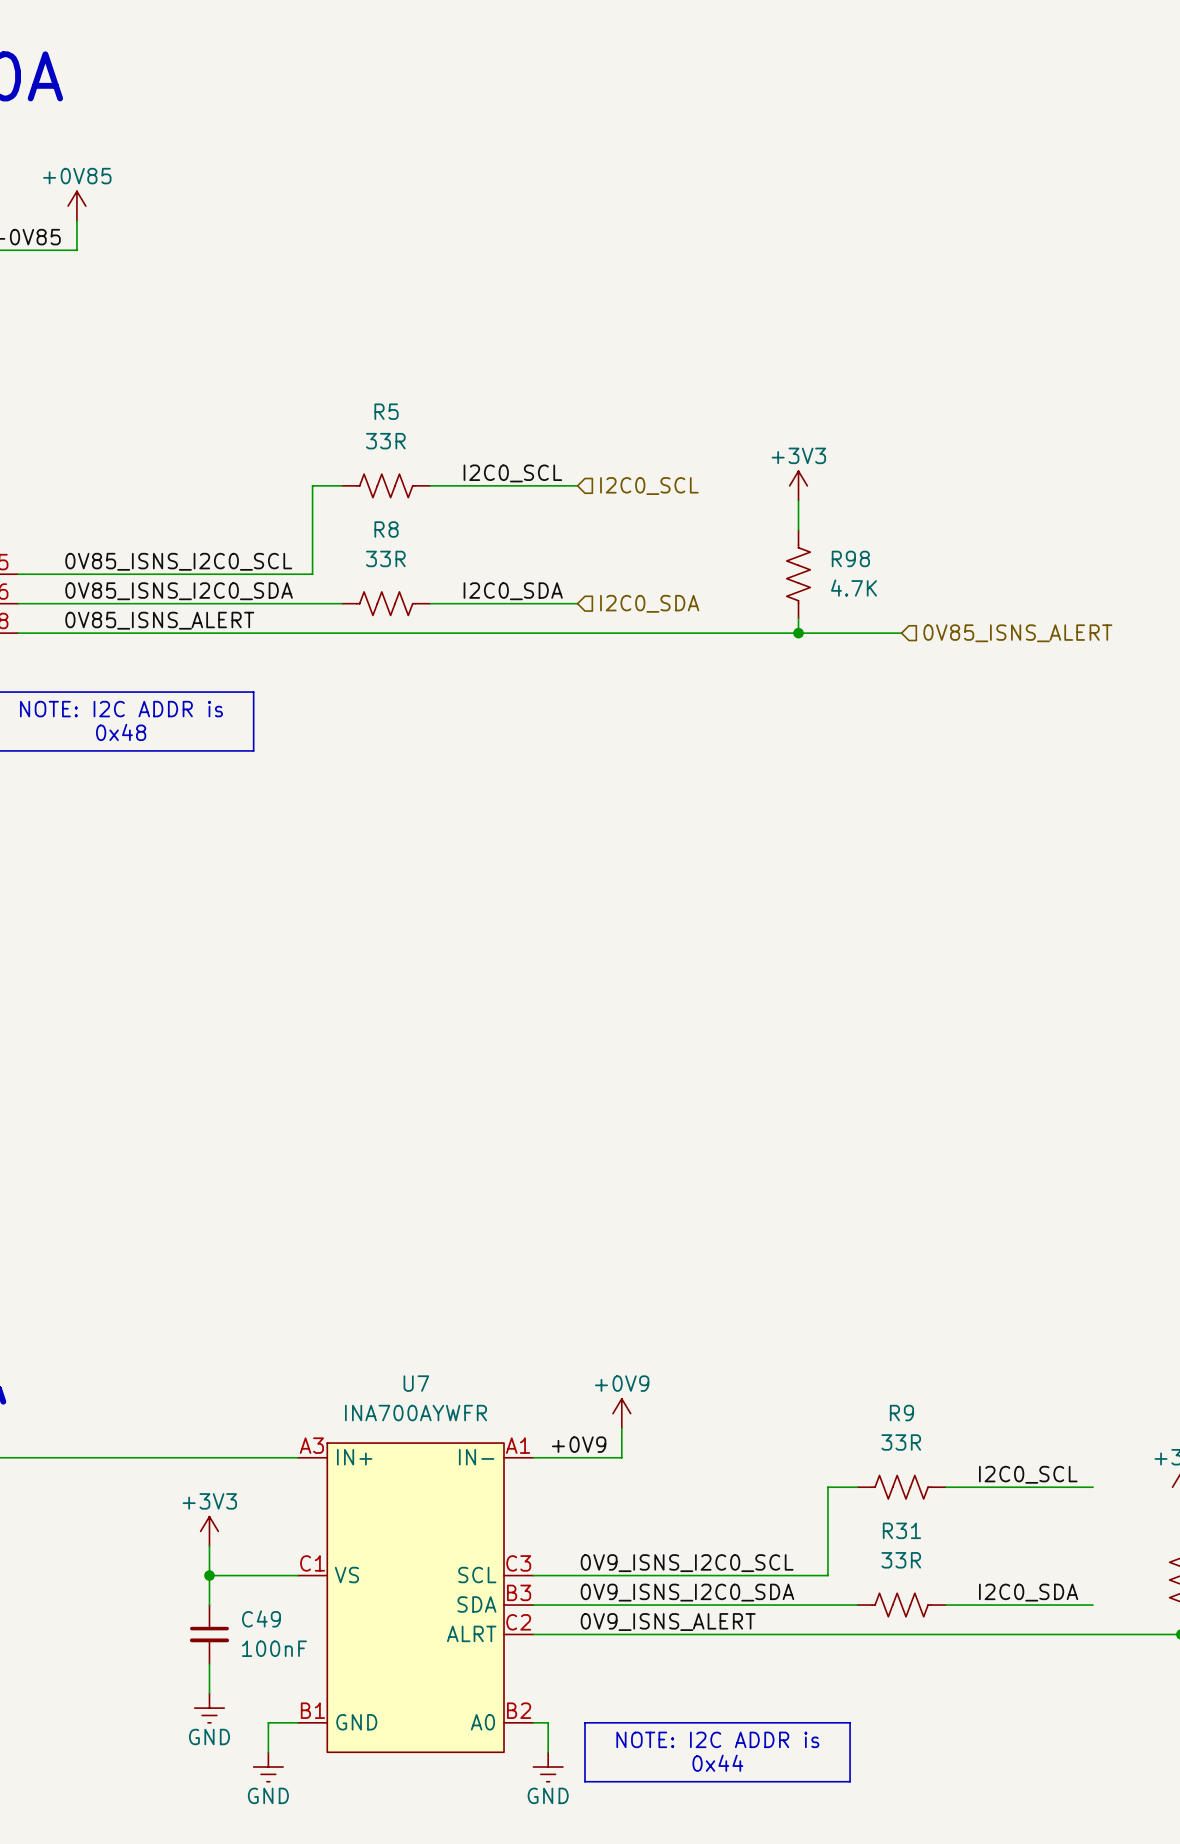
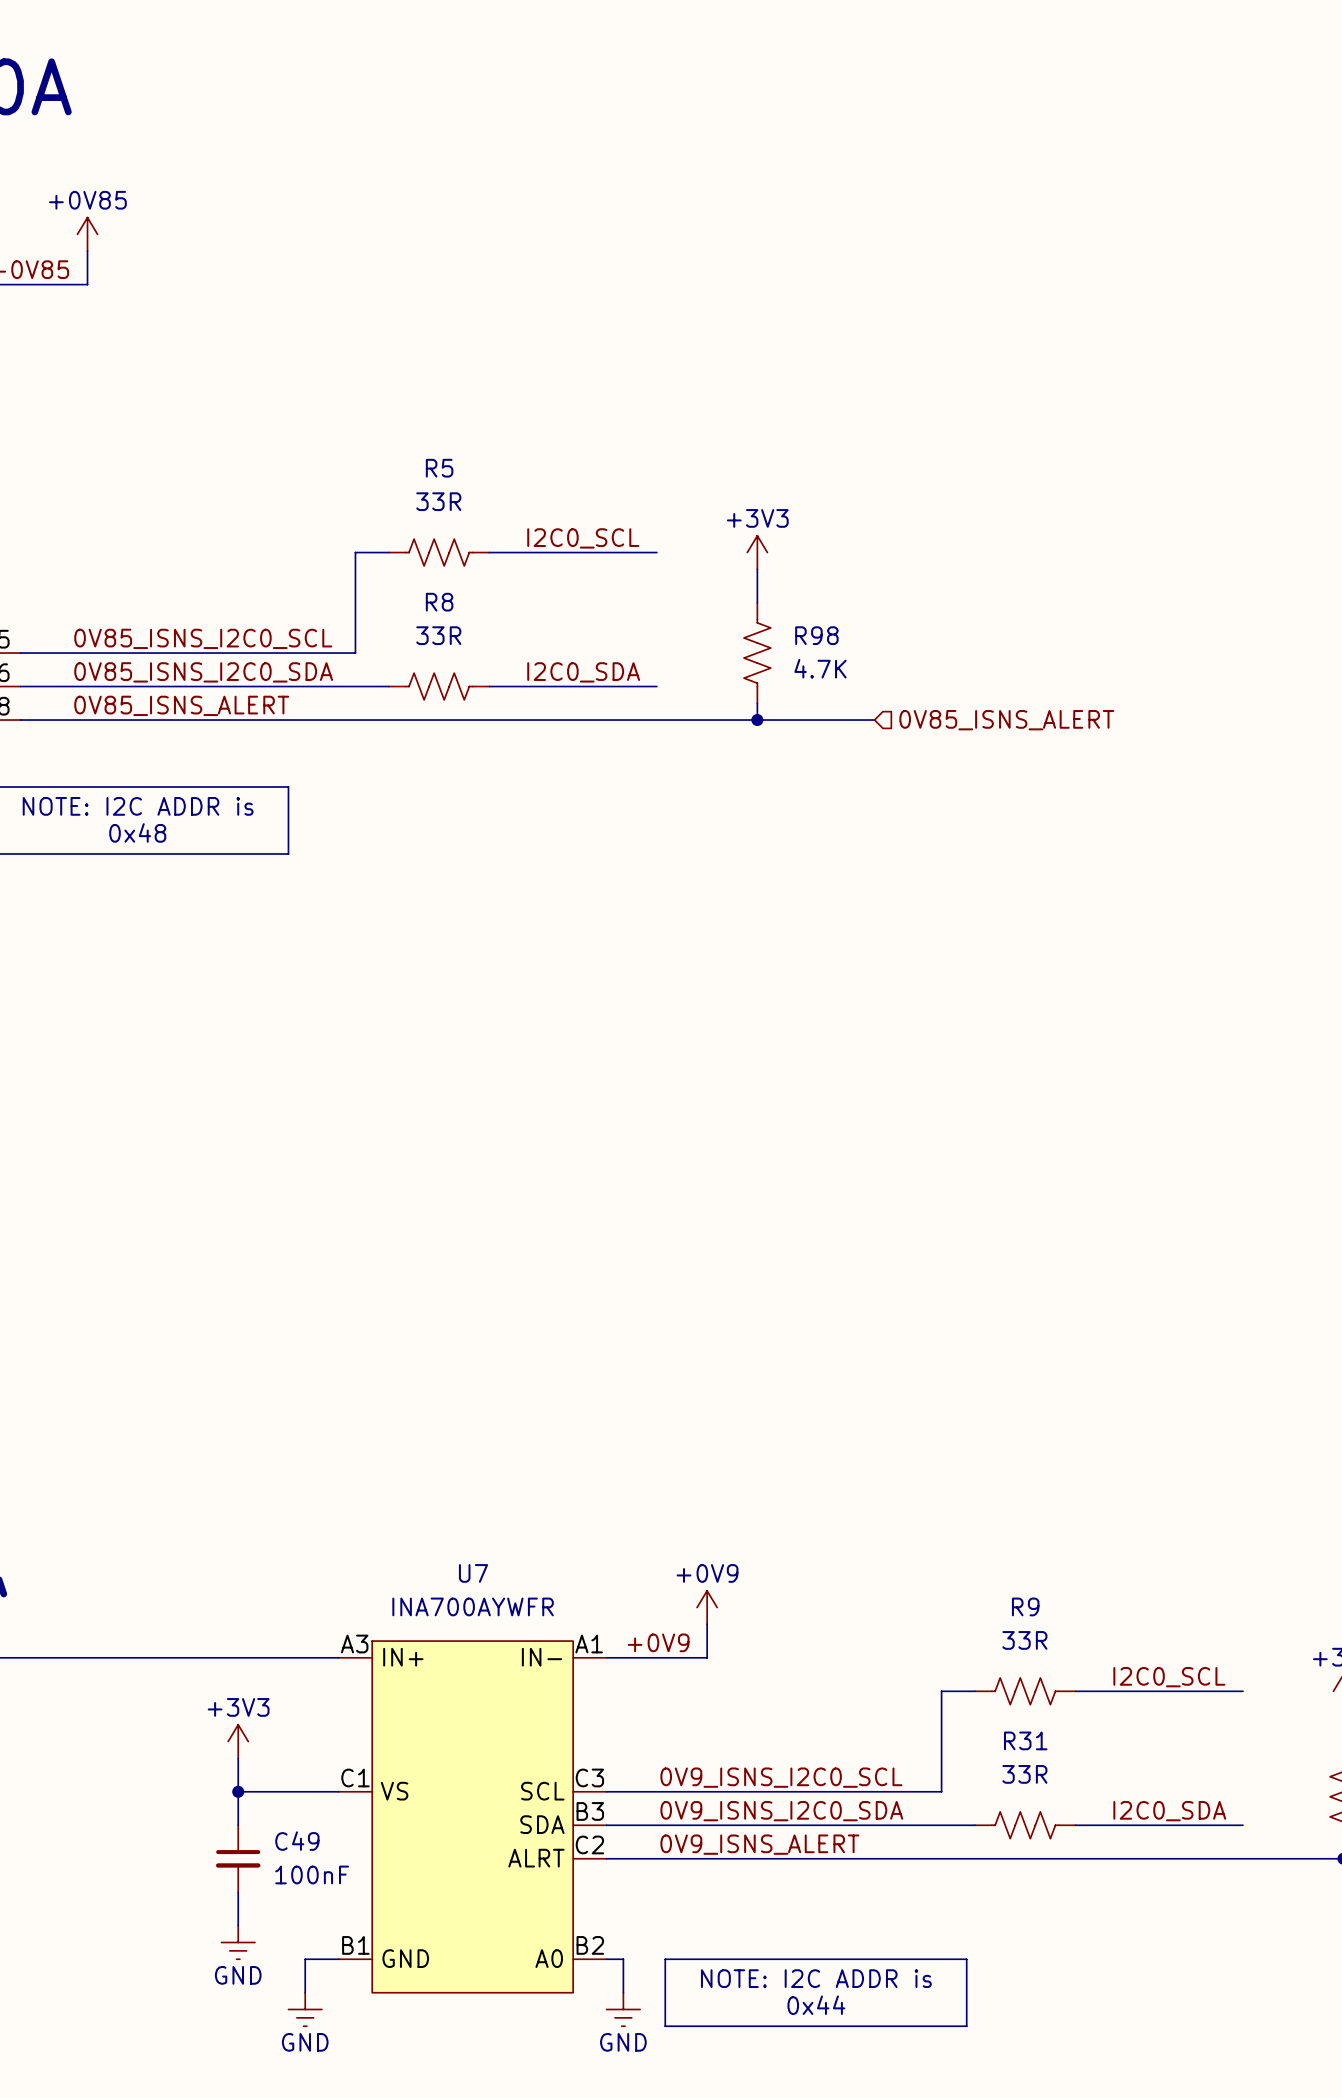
power symbol position: +3V3 (798, 485) -> +3V3 (757, 552)
hierarchical label: I2C0_SCL (649, 486) -> none
wire: (798, 500) (798, 530) -> (757, 569) (757, 602)
R98 position: (798, 574) -> (757, 653)
hierarchical label: I2C0_SDA (649, 603) -> none
wire: (798, 618) (798, 633) -> (757, 703) (757, 720)
junction: none -> (757, 720)
wire: (769, 633) (901, 633) -> none
junction: (798, 633) -> none
hierarchical label position: 0V85_ISNS_ALERT (1017, 633) -> 0V85_ISNS_ALERT (1006, 720)

